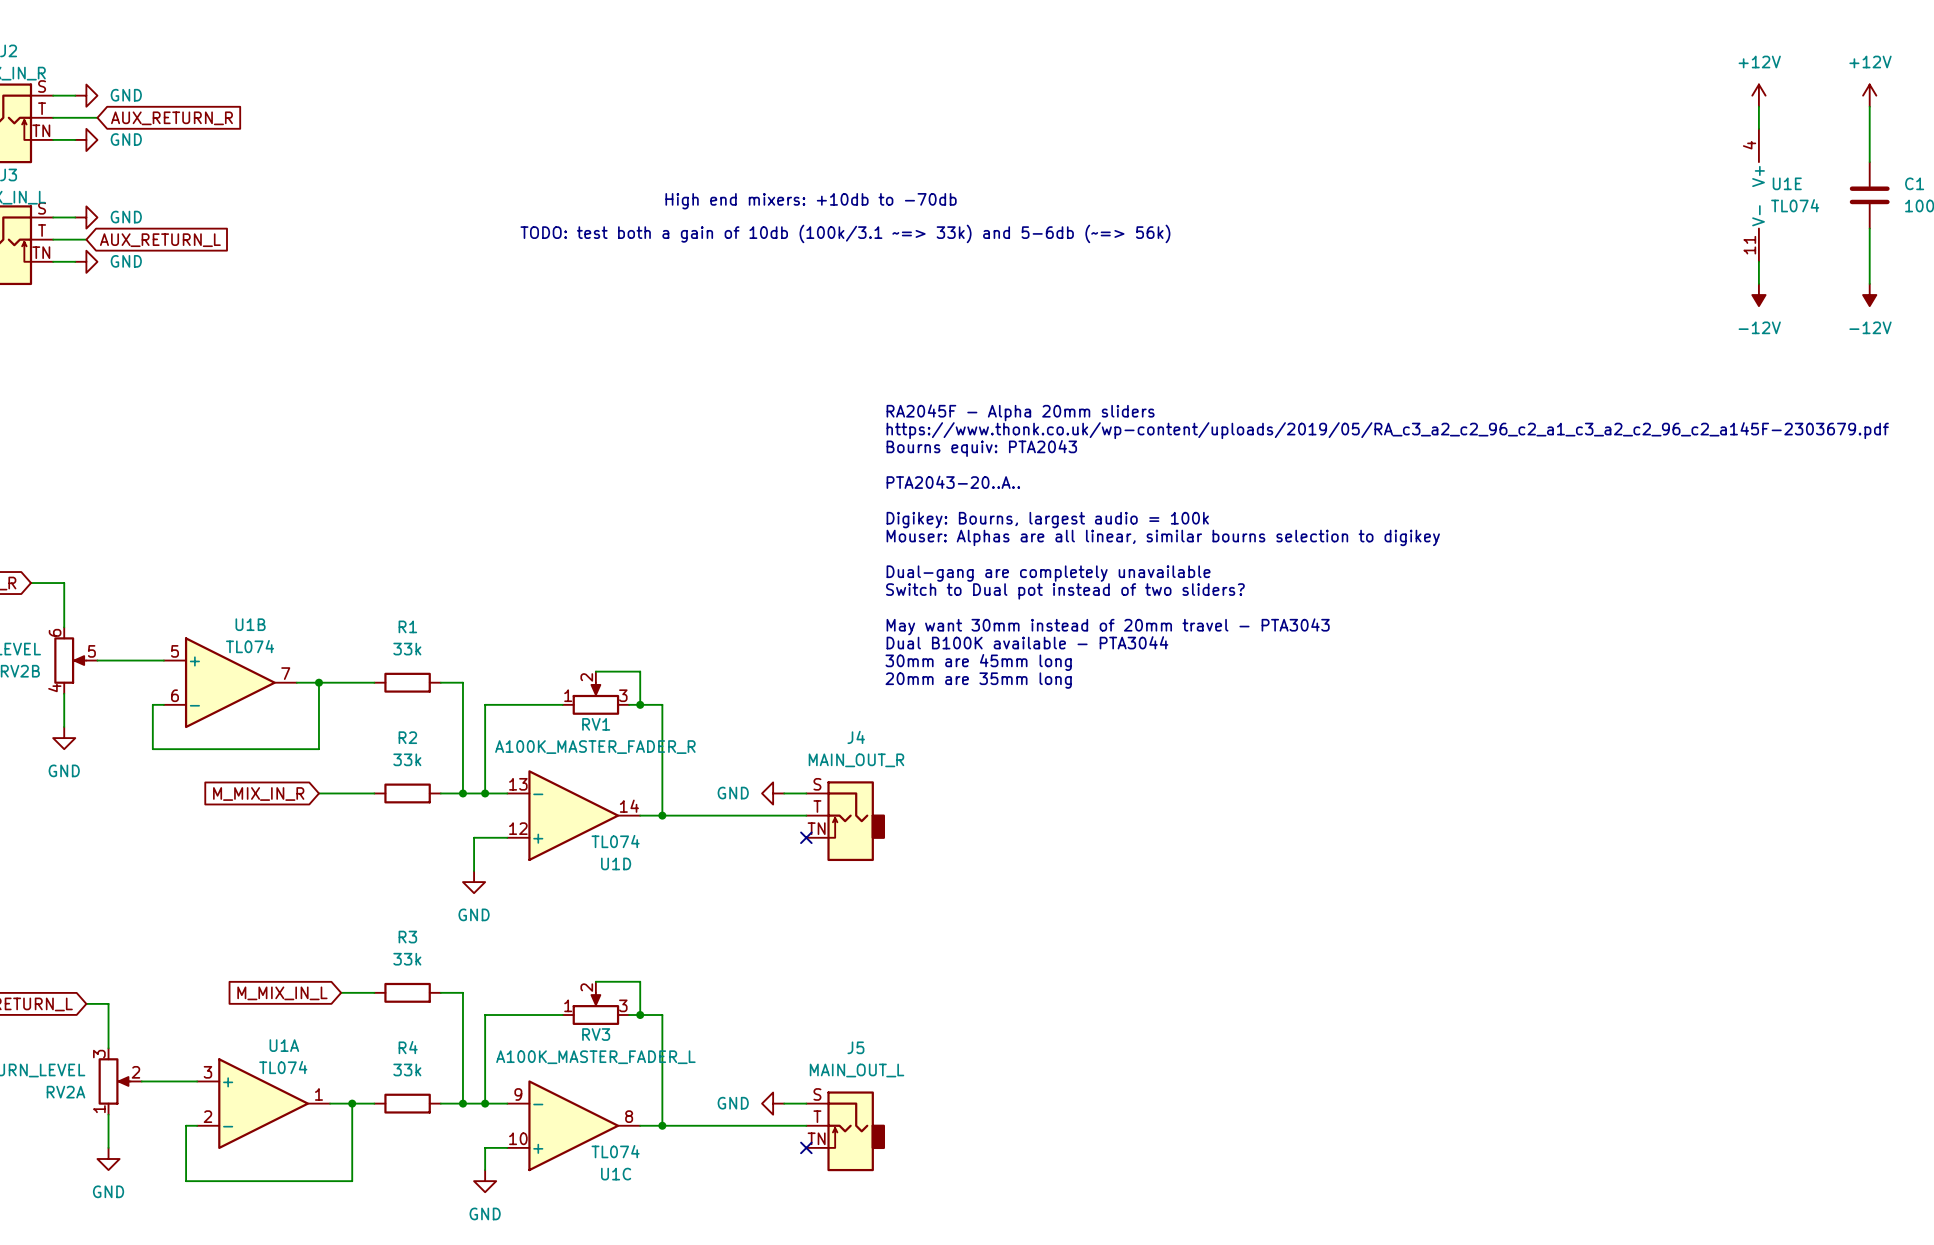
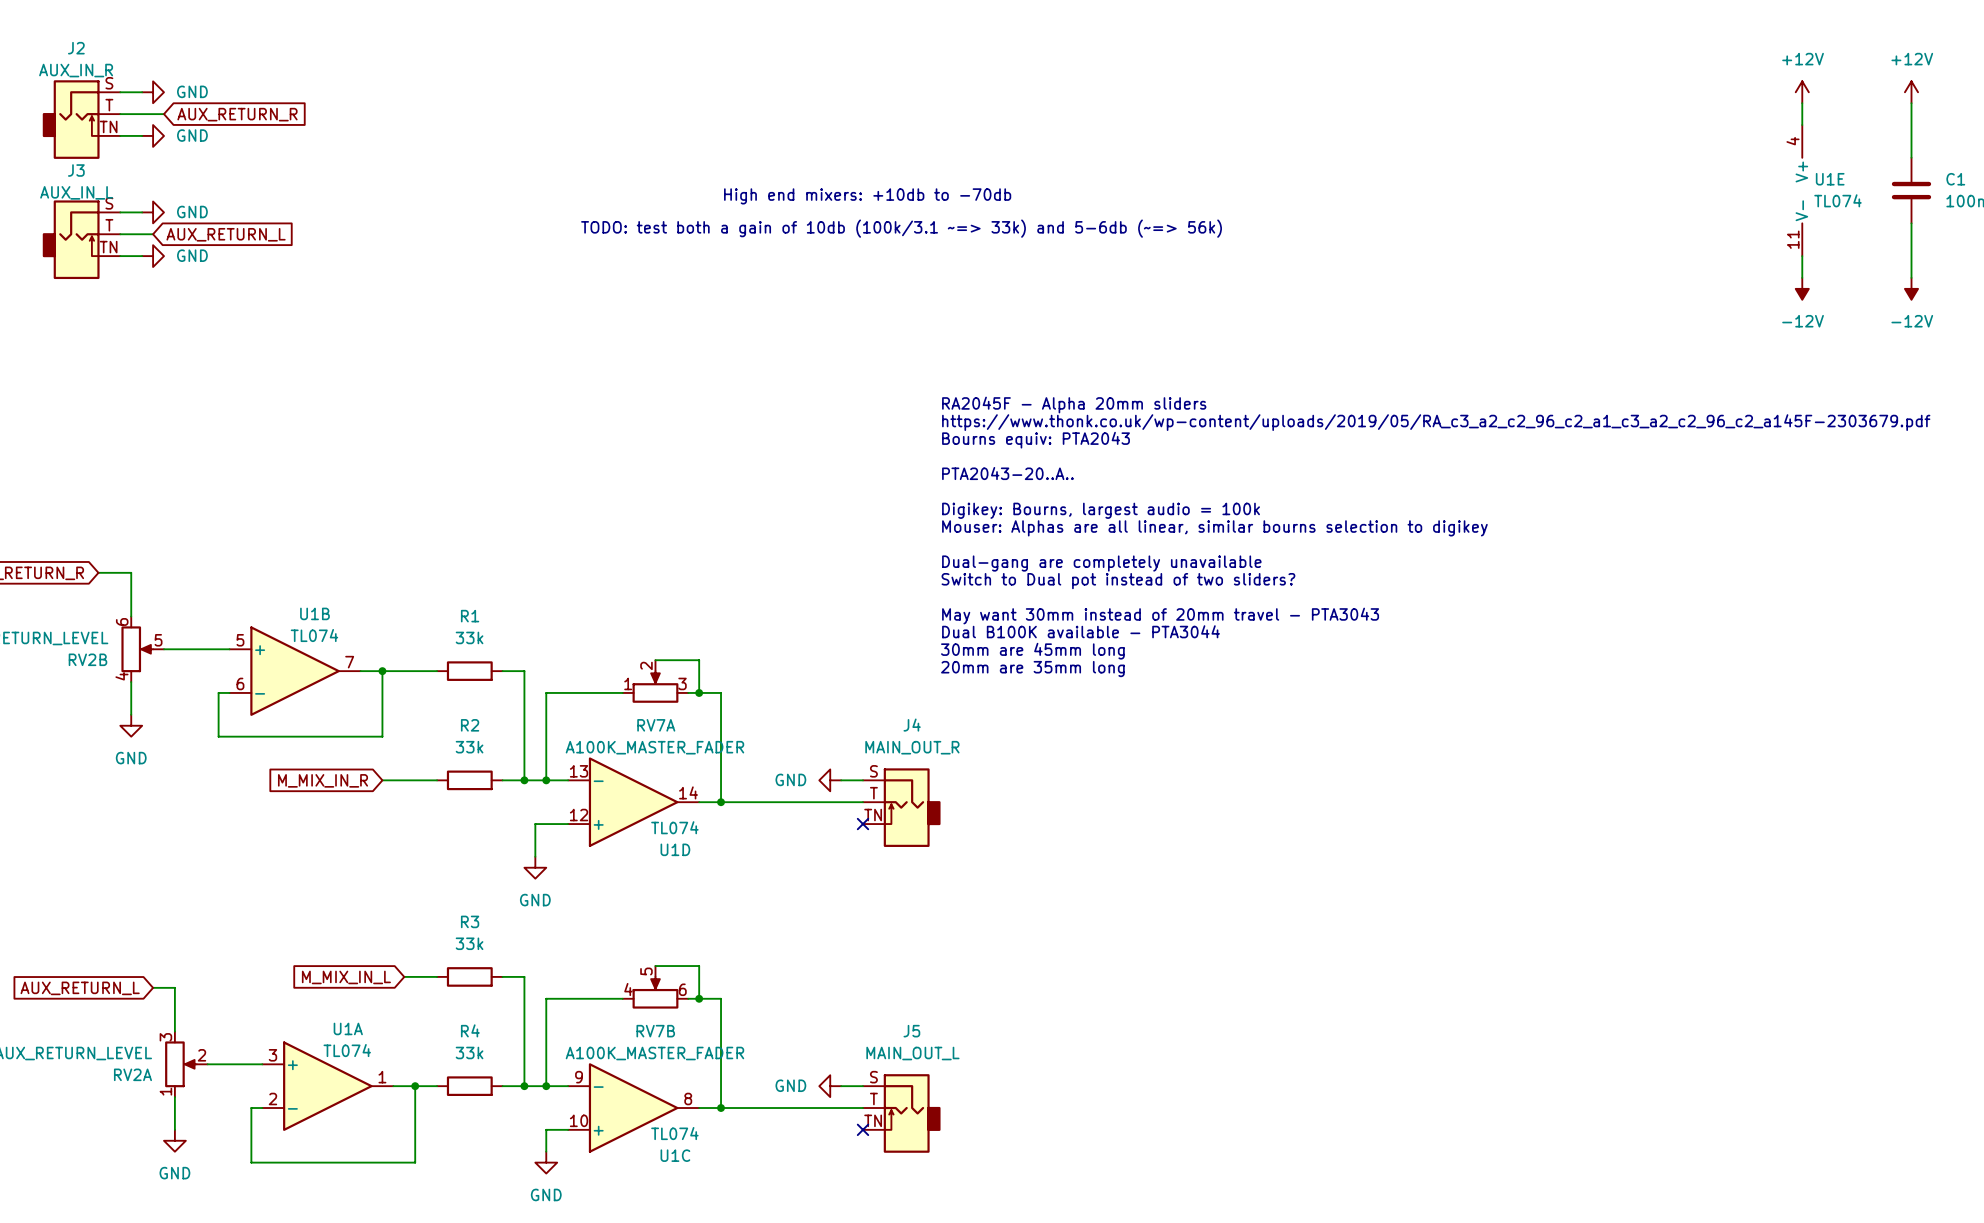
RV1 name: RV1 (596, 724) -> RV7A (656, 725)
RV1 value: A100K_MASTER_FADER_R (595, 747) -> A100K_MASTER_FADER (654, 747)
RV3 pin number: 2 (586, 987) -> 5 (646, 971)
RV3 pin number: 1 (568, 1005) -> 4 (628, 989)
RV3 pin number: 3 (623, 1005) -> 6 (682, 989)
RV3 name: RV3 (596, 1034) -> RV7B (655, 1031)
RV3 value: A100K_MASTER_FADER_L (595, 1057) -> A100K_MASTER_FADER (654, 1053)

